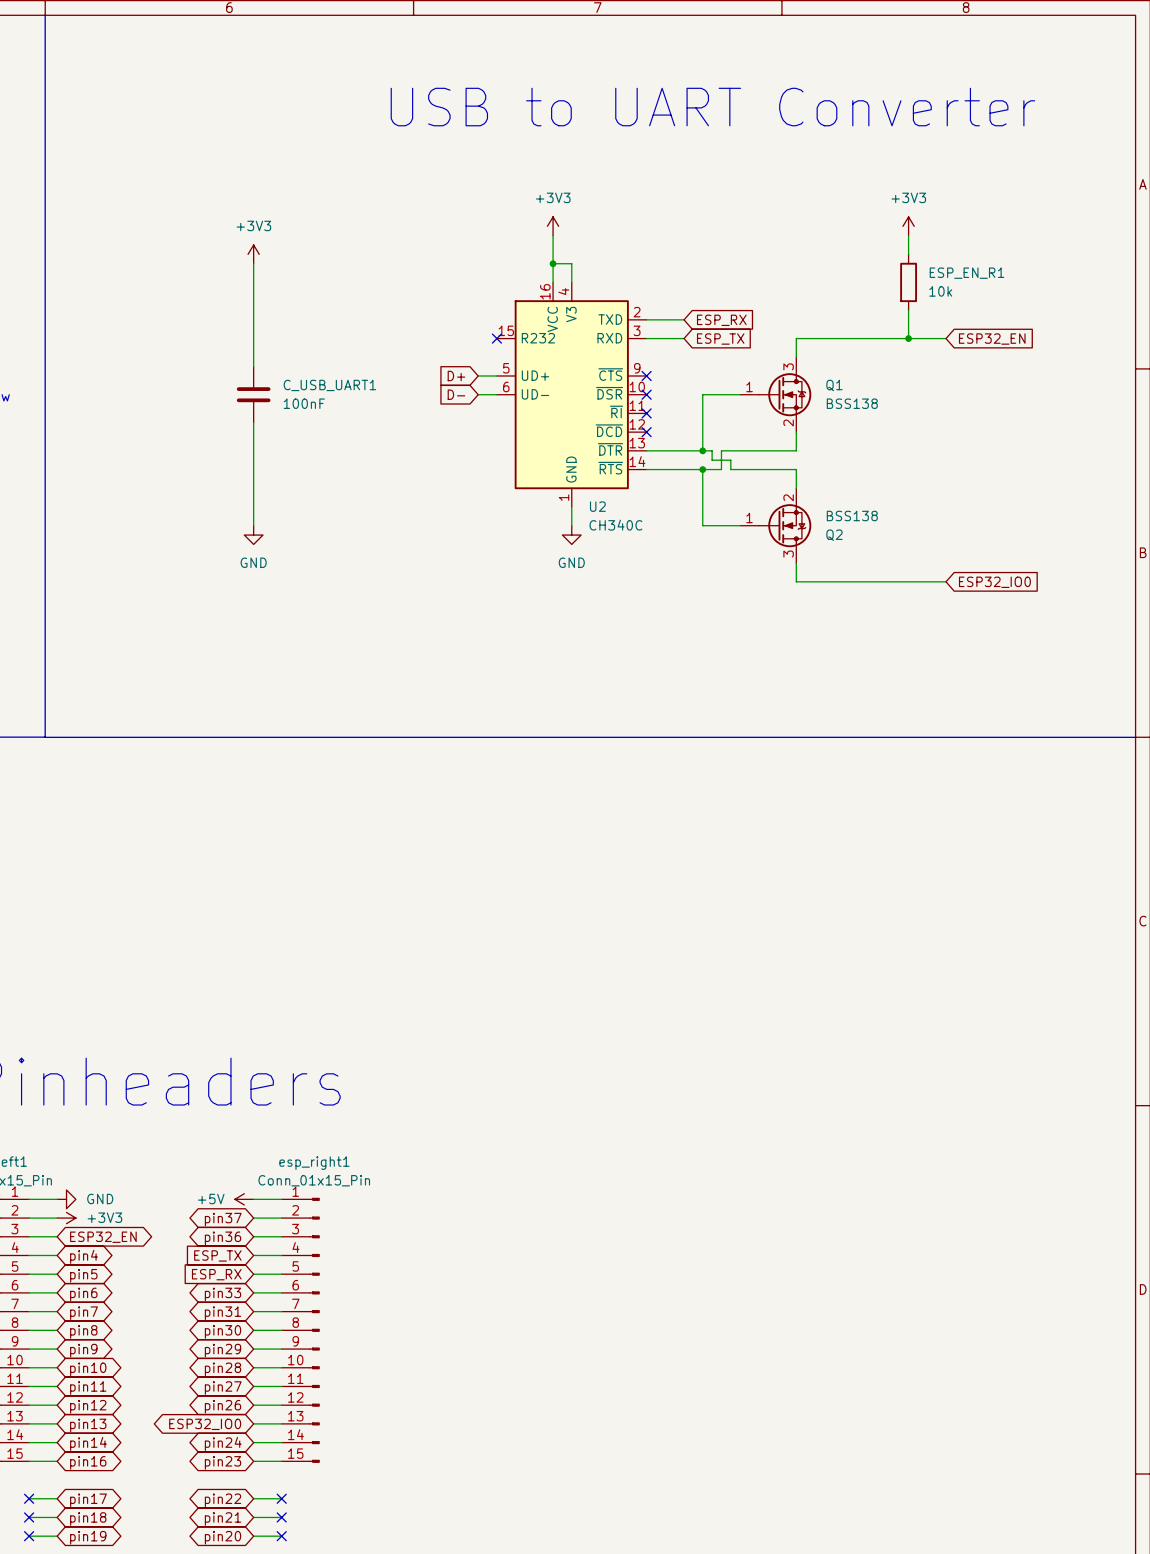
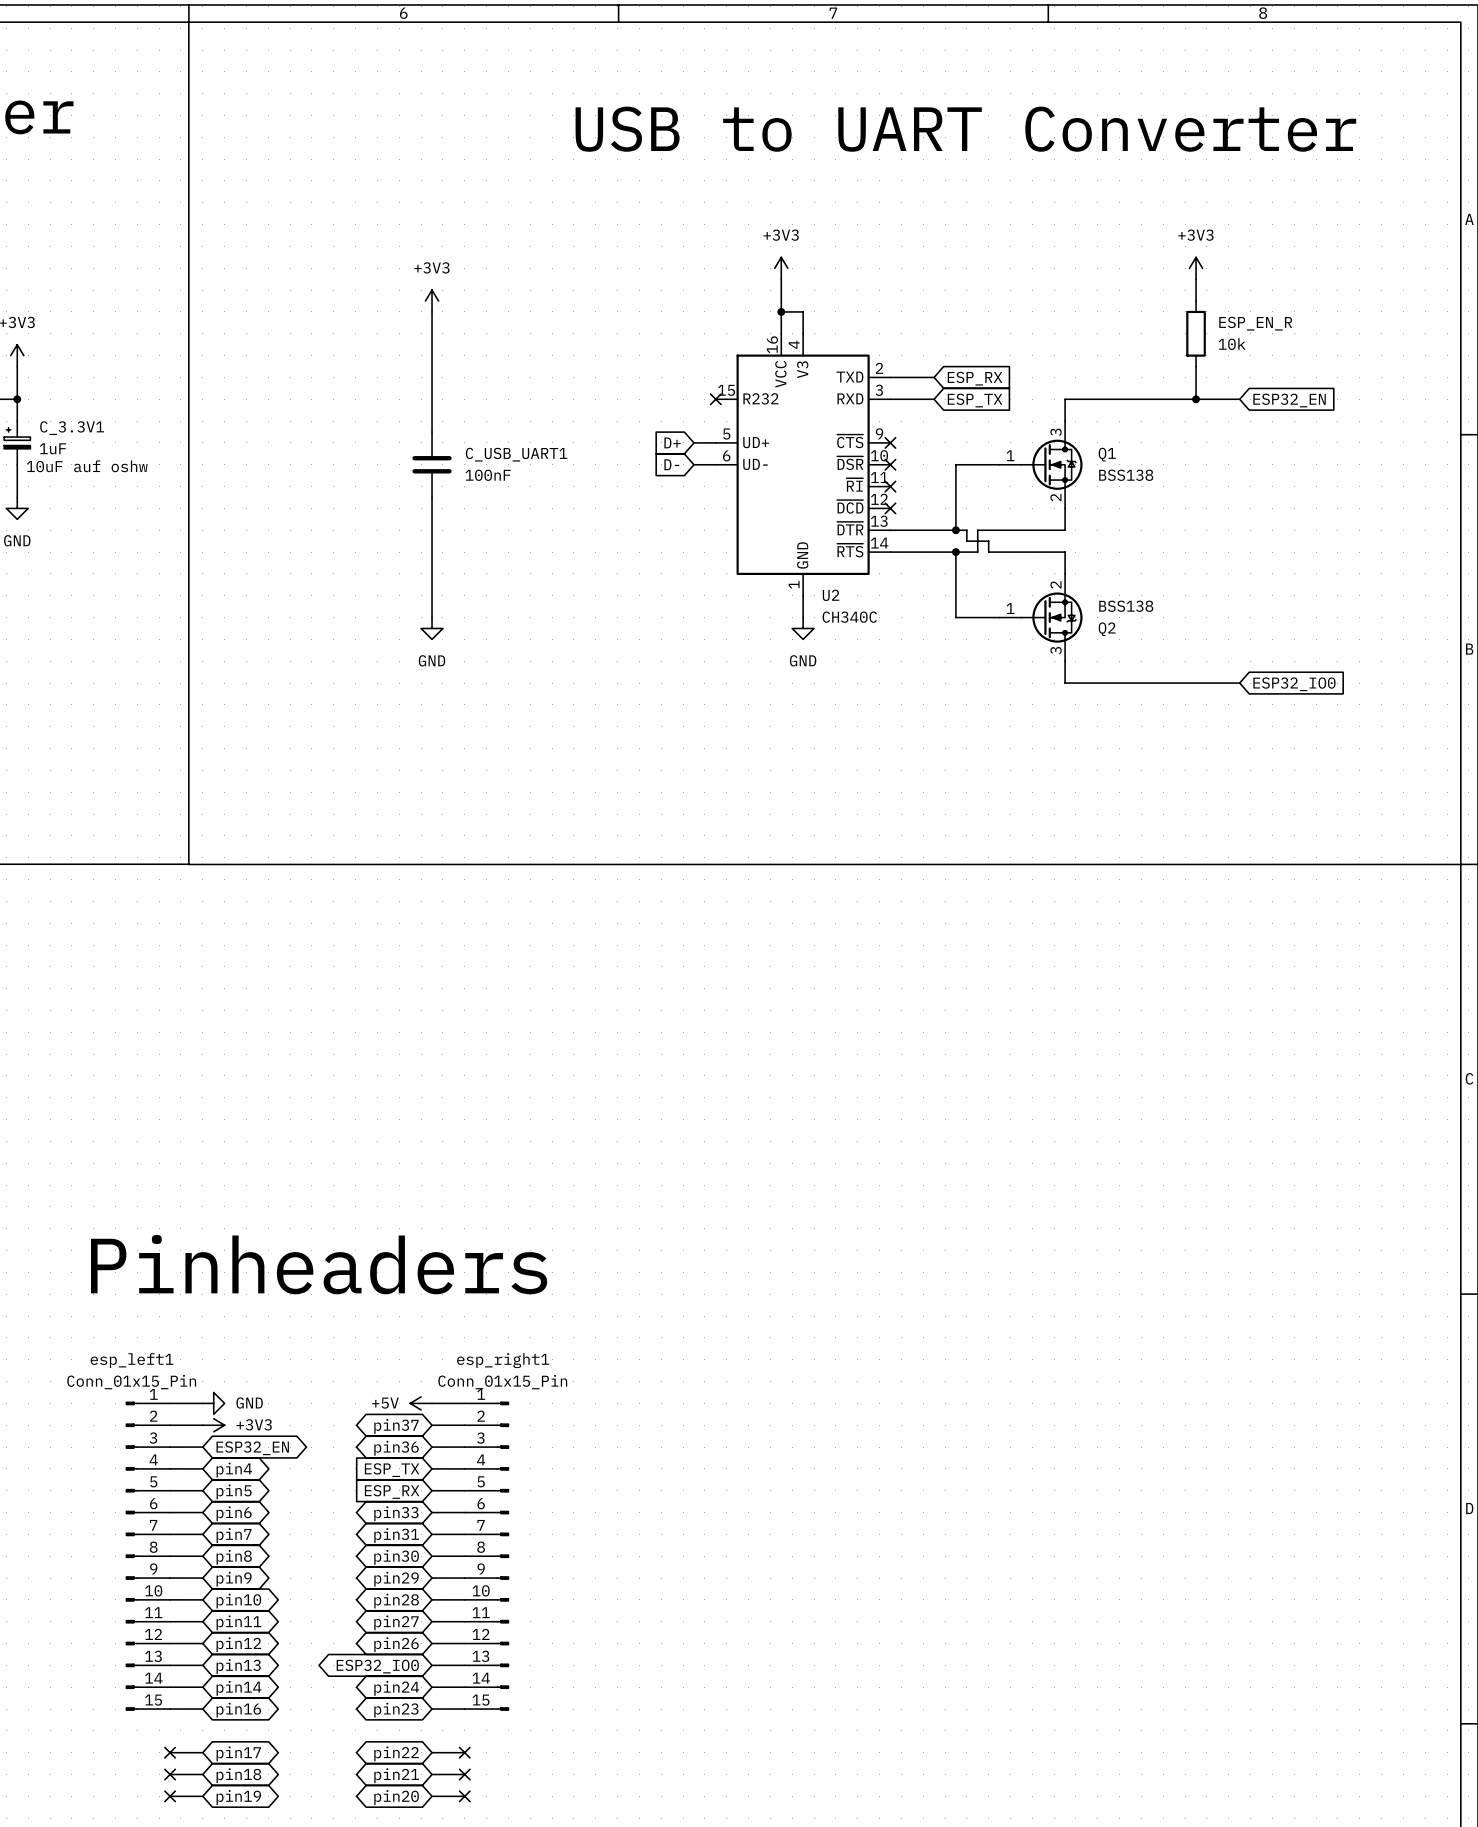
ESP_EN_R1 name: ESP_EN_R1 (967, 273) -> ESP_EN_R (1255, 323)

